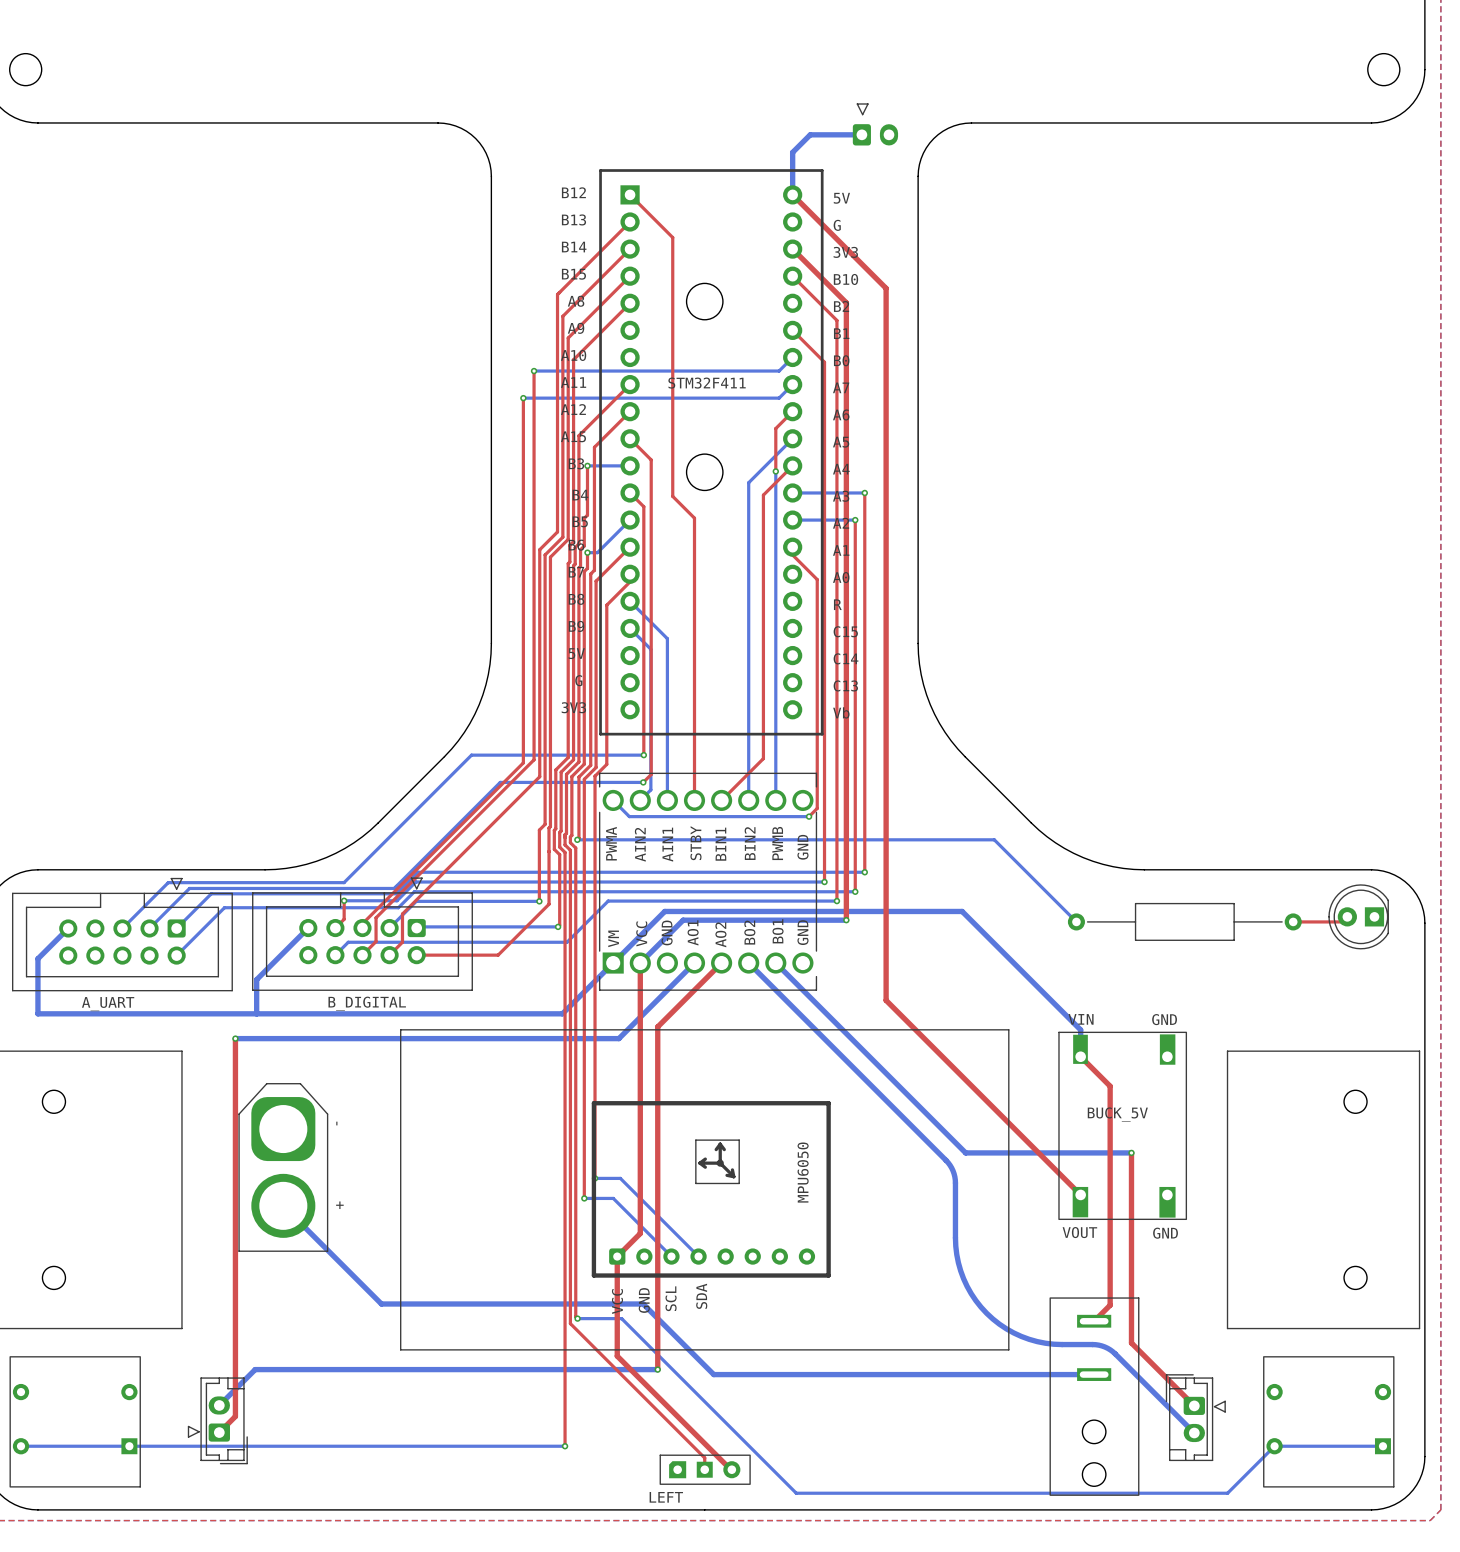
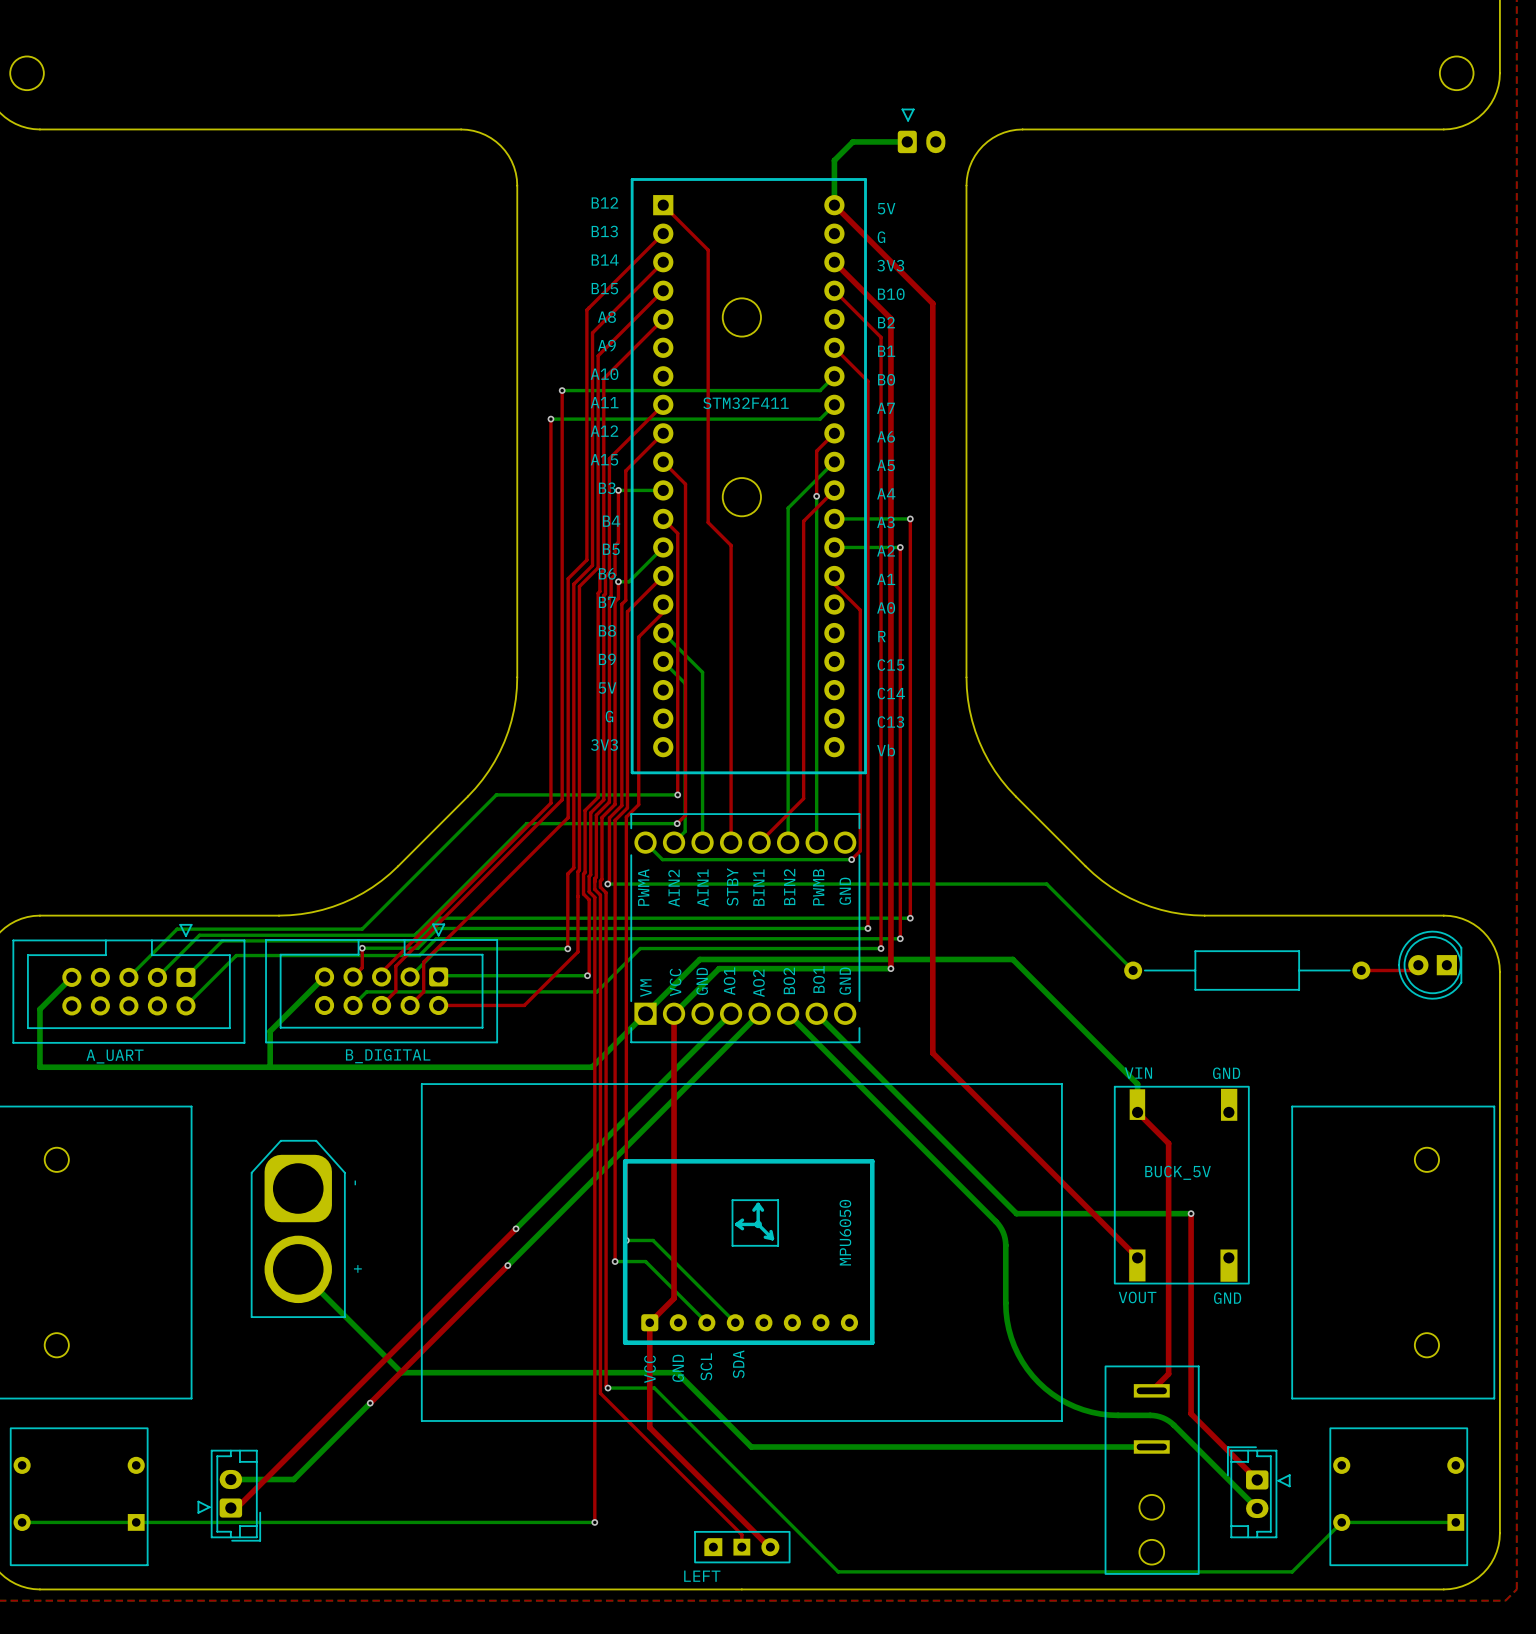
bottom track: none -> (759, 1013) (507, 1265)
top track: (721, 963) (657, 1026) (657, 1369) -> none
bottom track: (235, 1038) (618, 1038) -> (514, 1230) (651, 1093)
top track: (235, 1038) (235, 1416) (219, 1432) -> (516, 1228) (236, 1508) (230, 1508)
via: (235, 1038) -> none
via: none -> (516, 1228)
top track: none -> (507, 1265) (370, 1403)
via: none -> (507, 1265)
via: none -> (370, 1403)
bottom track: (657, 1369) (255, 1369) (219, 1405) -> (370, 1403) (293, 1479) (230, 1479)
via: (657, 1369) -> none

